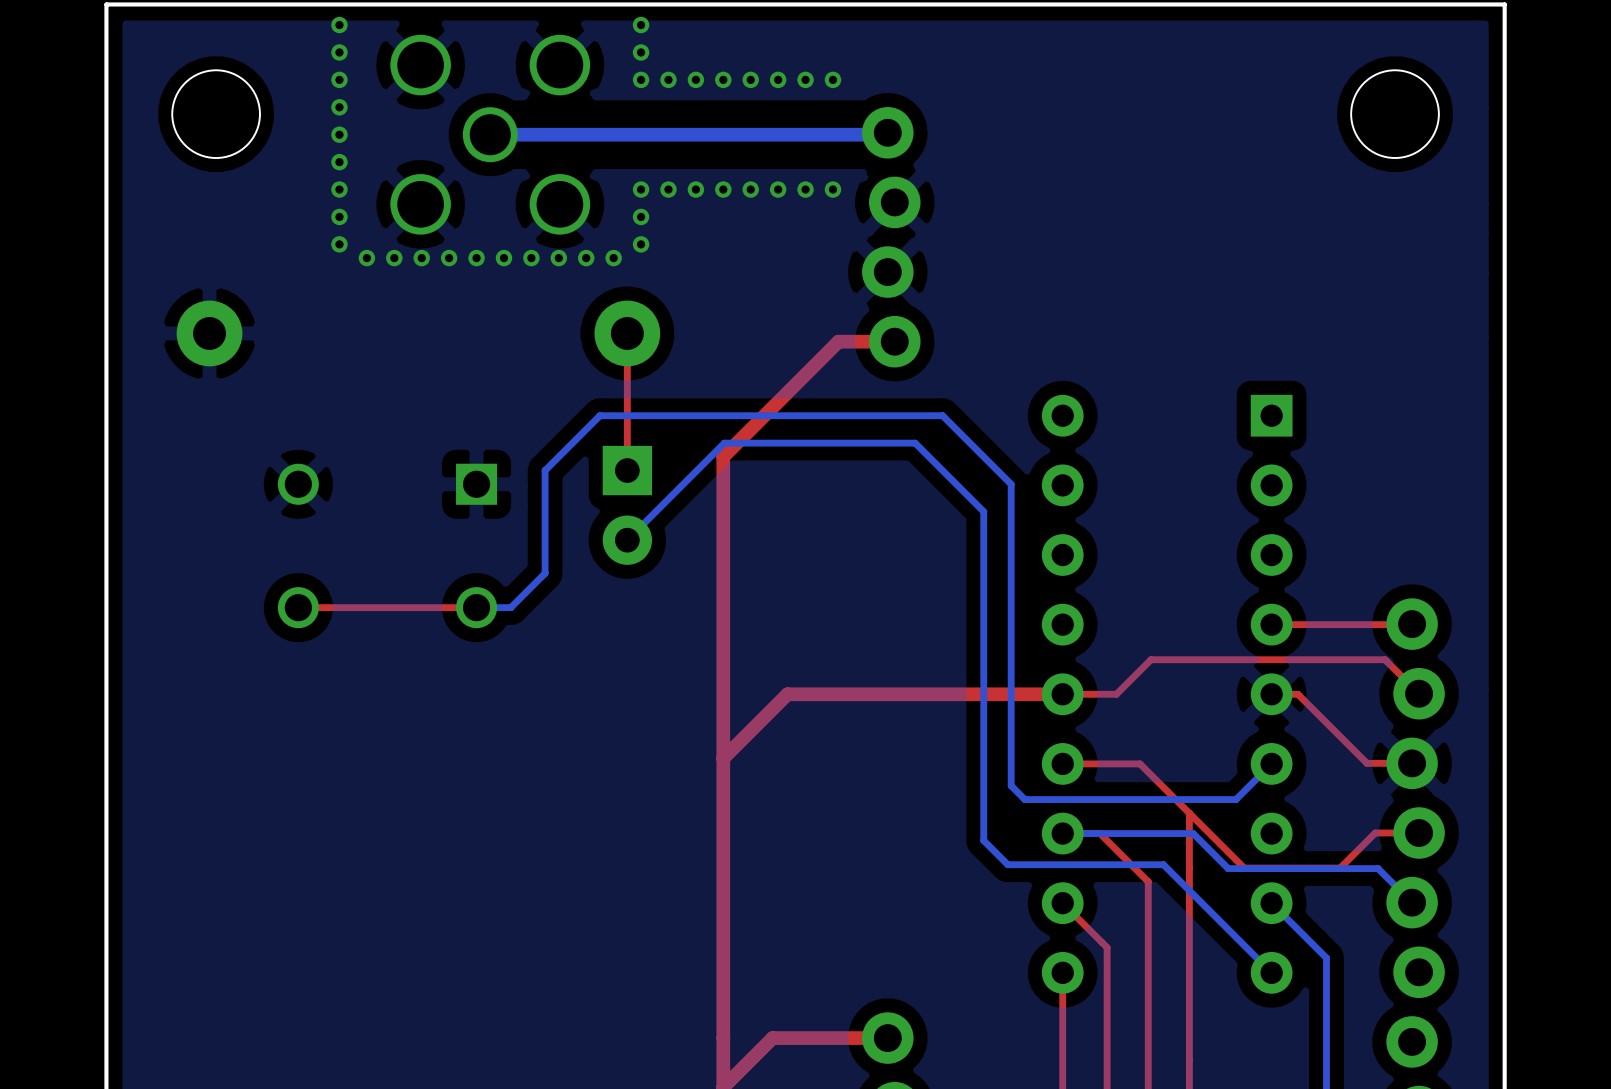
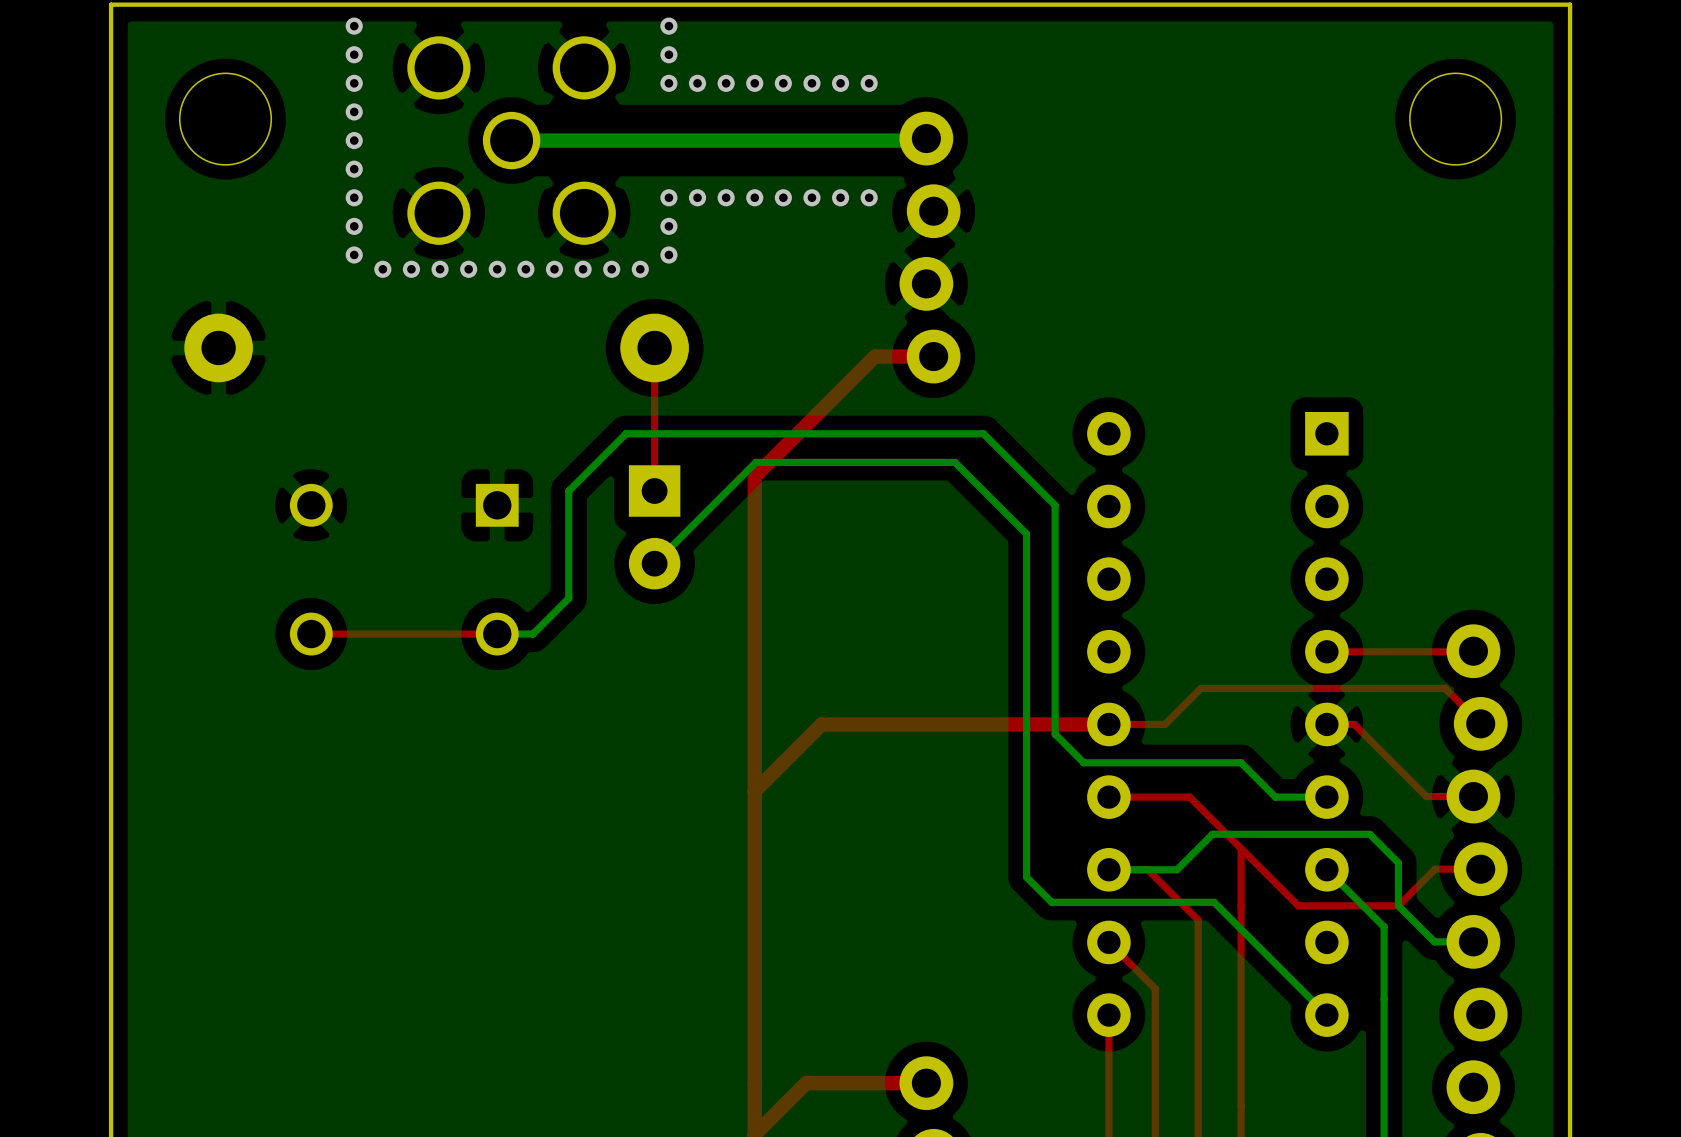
bottom track: (1011, 703) (1011, 785) (1024, 799) (1161, 799) -> (1055, 734) (1083, 762) (1241, 762) (1275, 797) (1326, 797)
bottom track: (1271, 763) (1236, 799) -> none
bottom track: none -> (1212, 834) (1177, 869)
bottom track: (1127, 833) (1193, 833) (1228, 868) (1378, 868) (1412, 902) -> (1289, 834) (1369, 834) (1398, 862) (1398, 905) (1434, 941) (1473, 941)
bottom track: (1271, 903) (1326, 958) -> (1326, 869) (1384, 926) (1384, 999)

